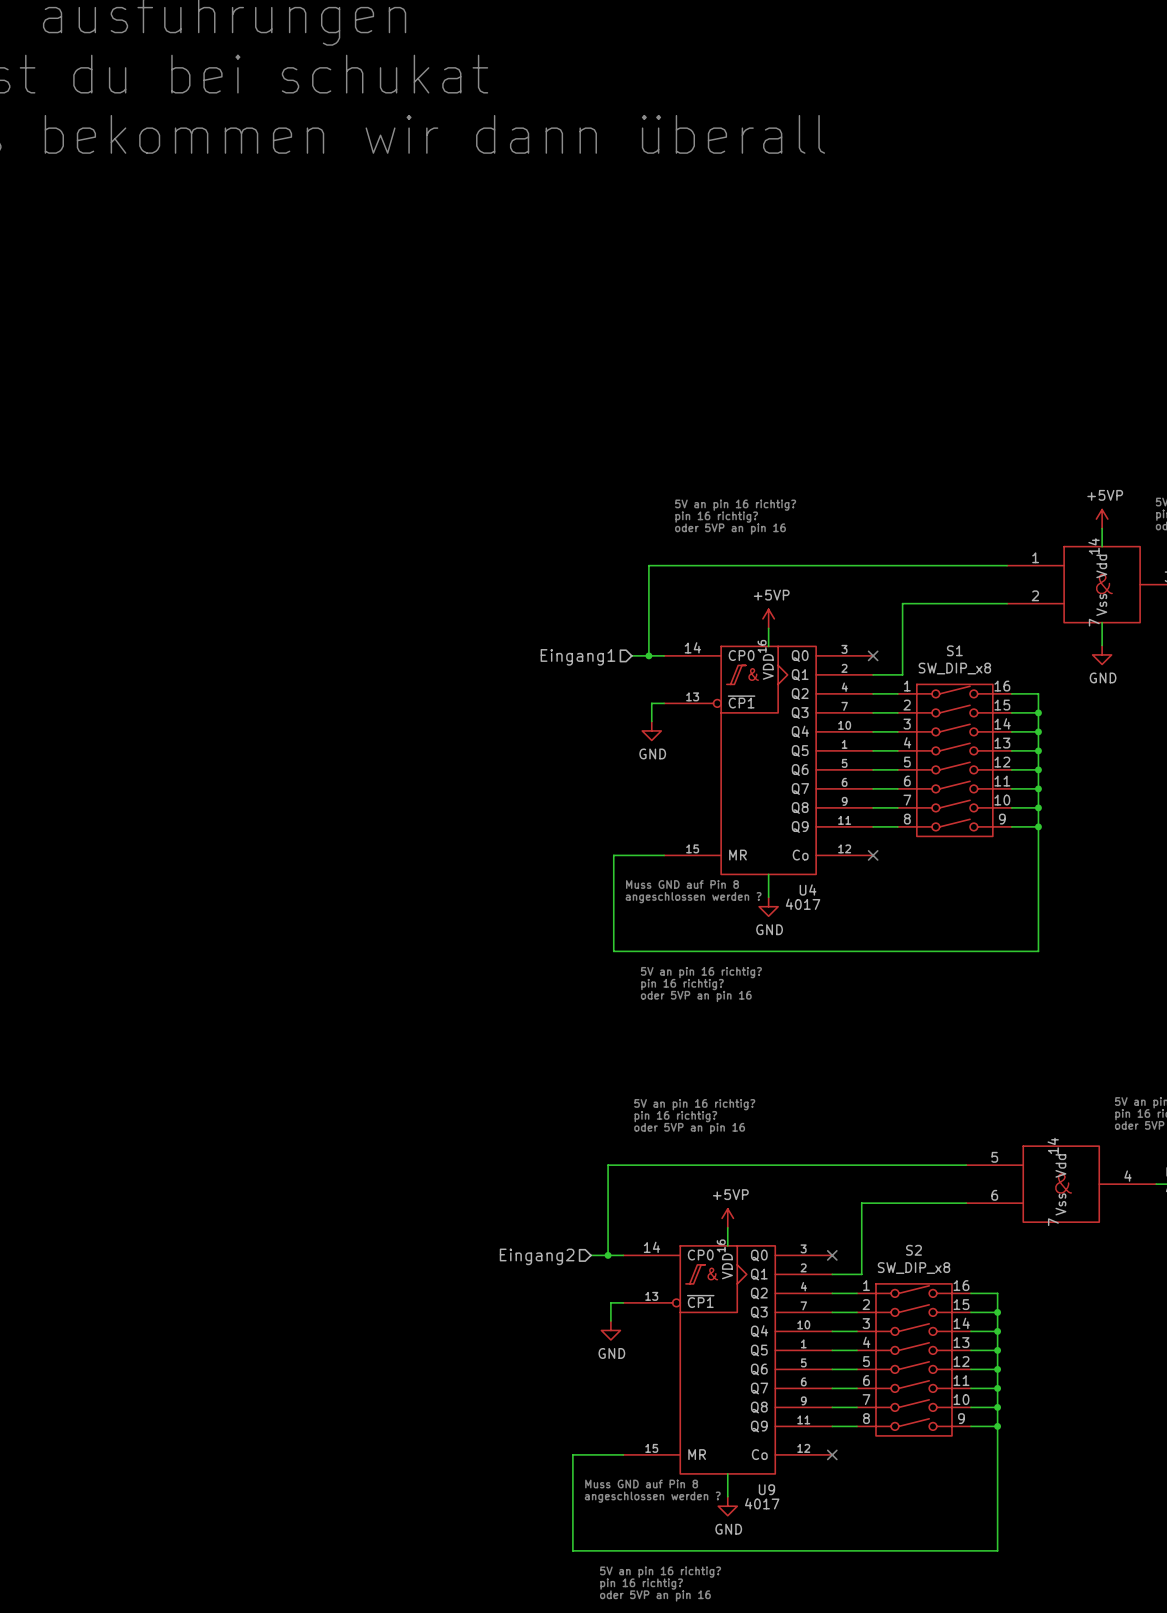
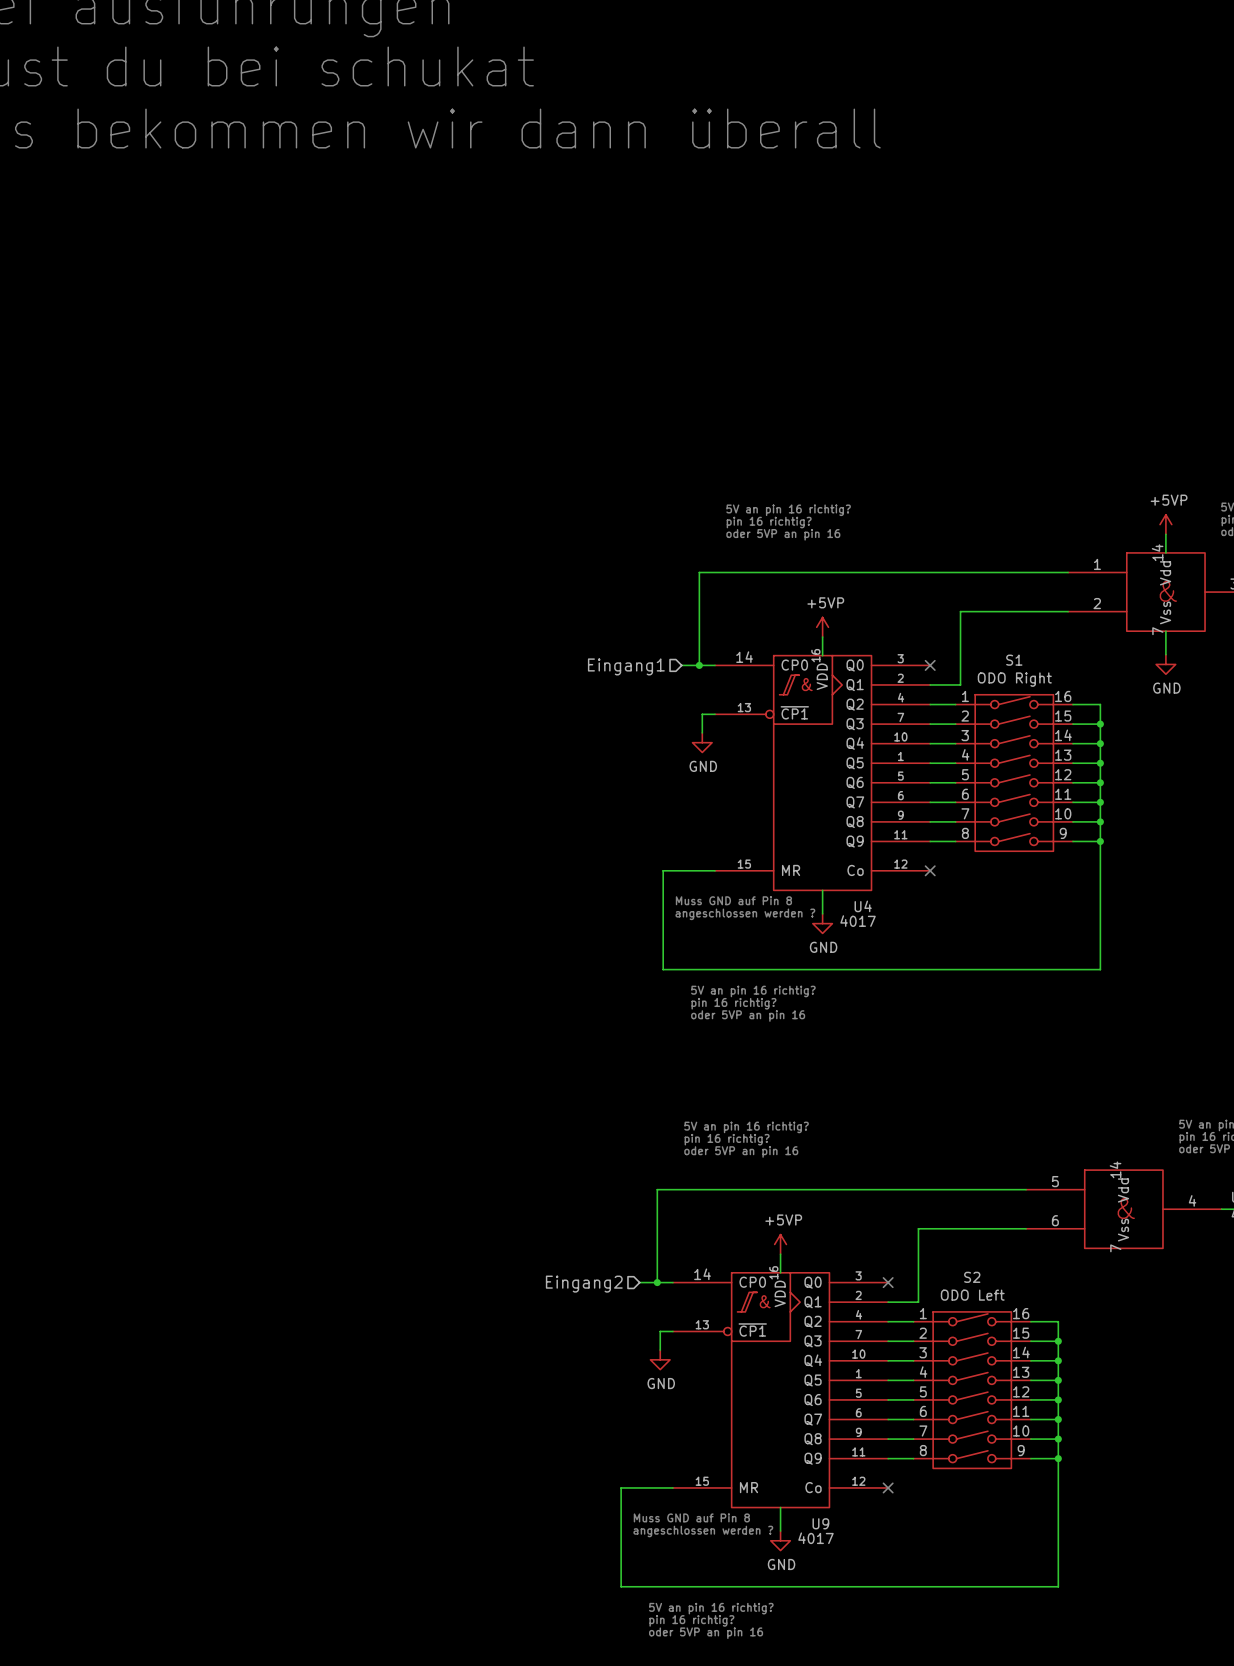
S1 value: SW_DIP_x8 (954, 668) -> ODO Right (1014, 679)
S2 value: SW_DIP_x8 (913, 1268) -> ODO Left (972, 1295)

